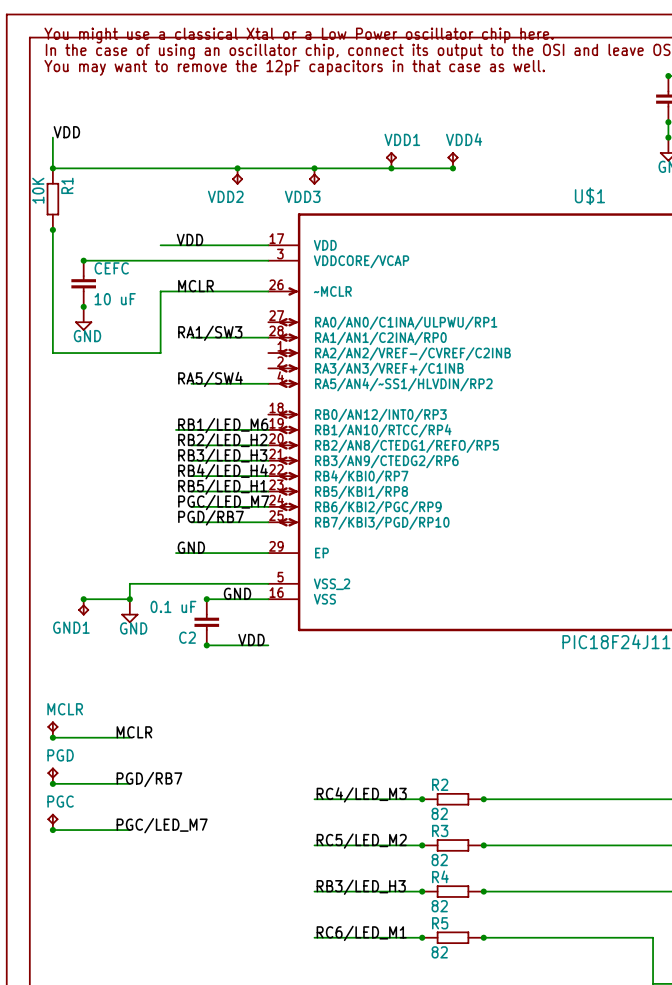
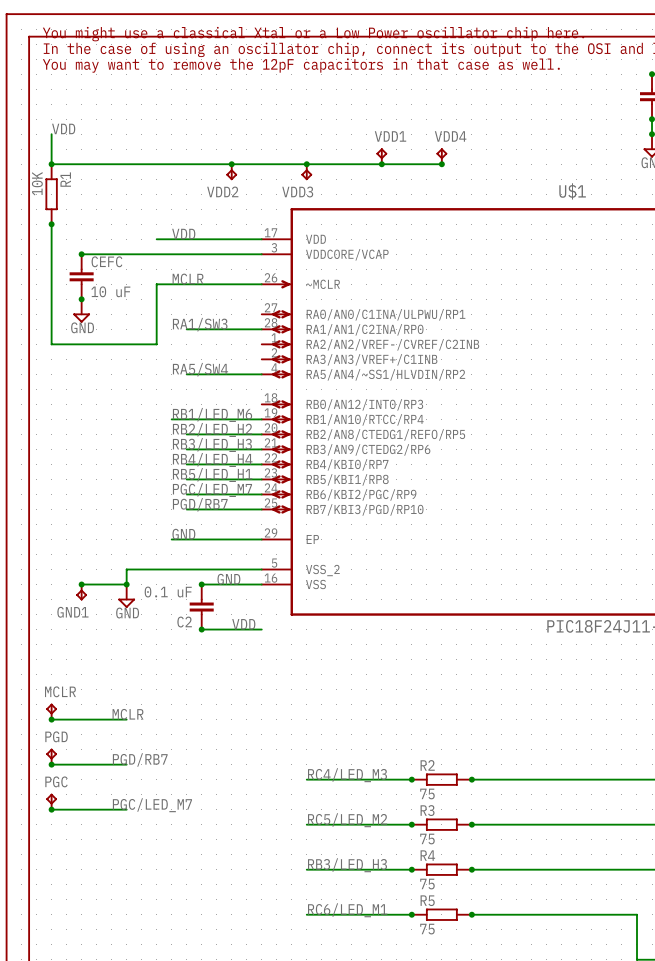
R2 value: 82 (439, 813) -> 75 (427, 793)
R3 value: 82 (439, 860) -> 75 (427, 839)
R4 value: 82 (439, 906) -> 75 (427, 884)
R5 value: 82 (439, 952) -> 75 (427, 929)

